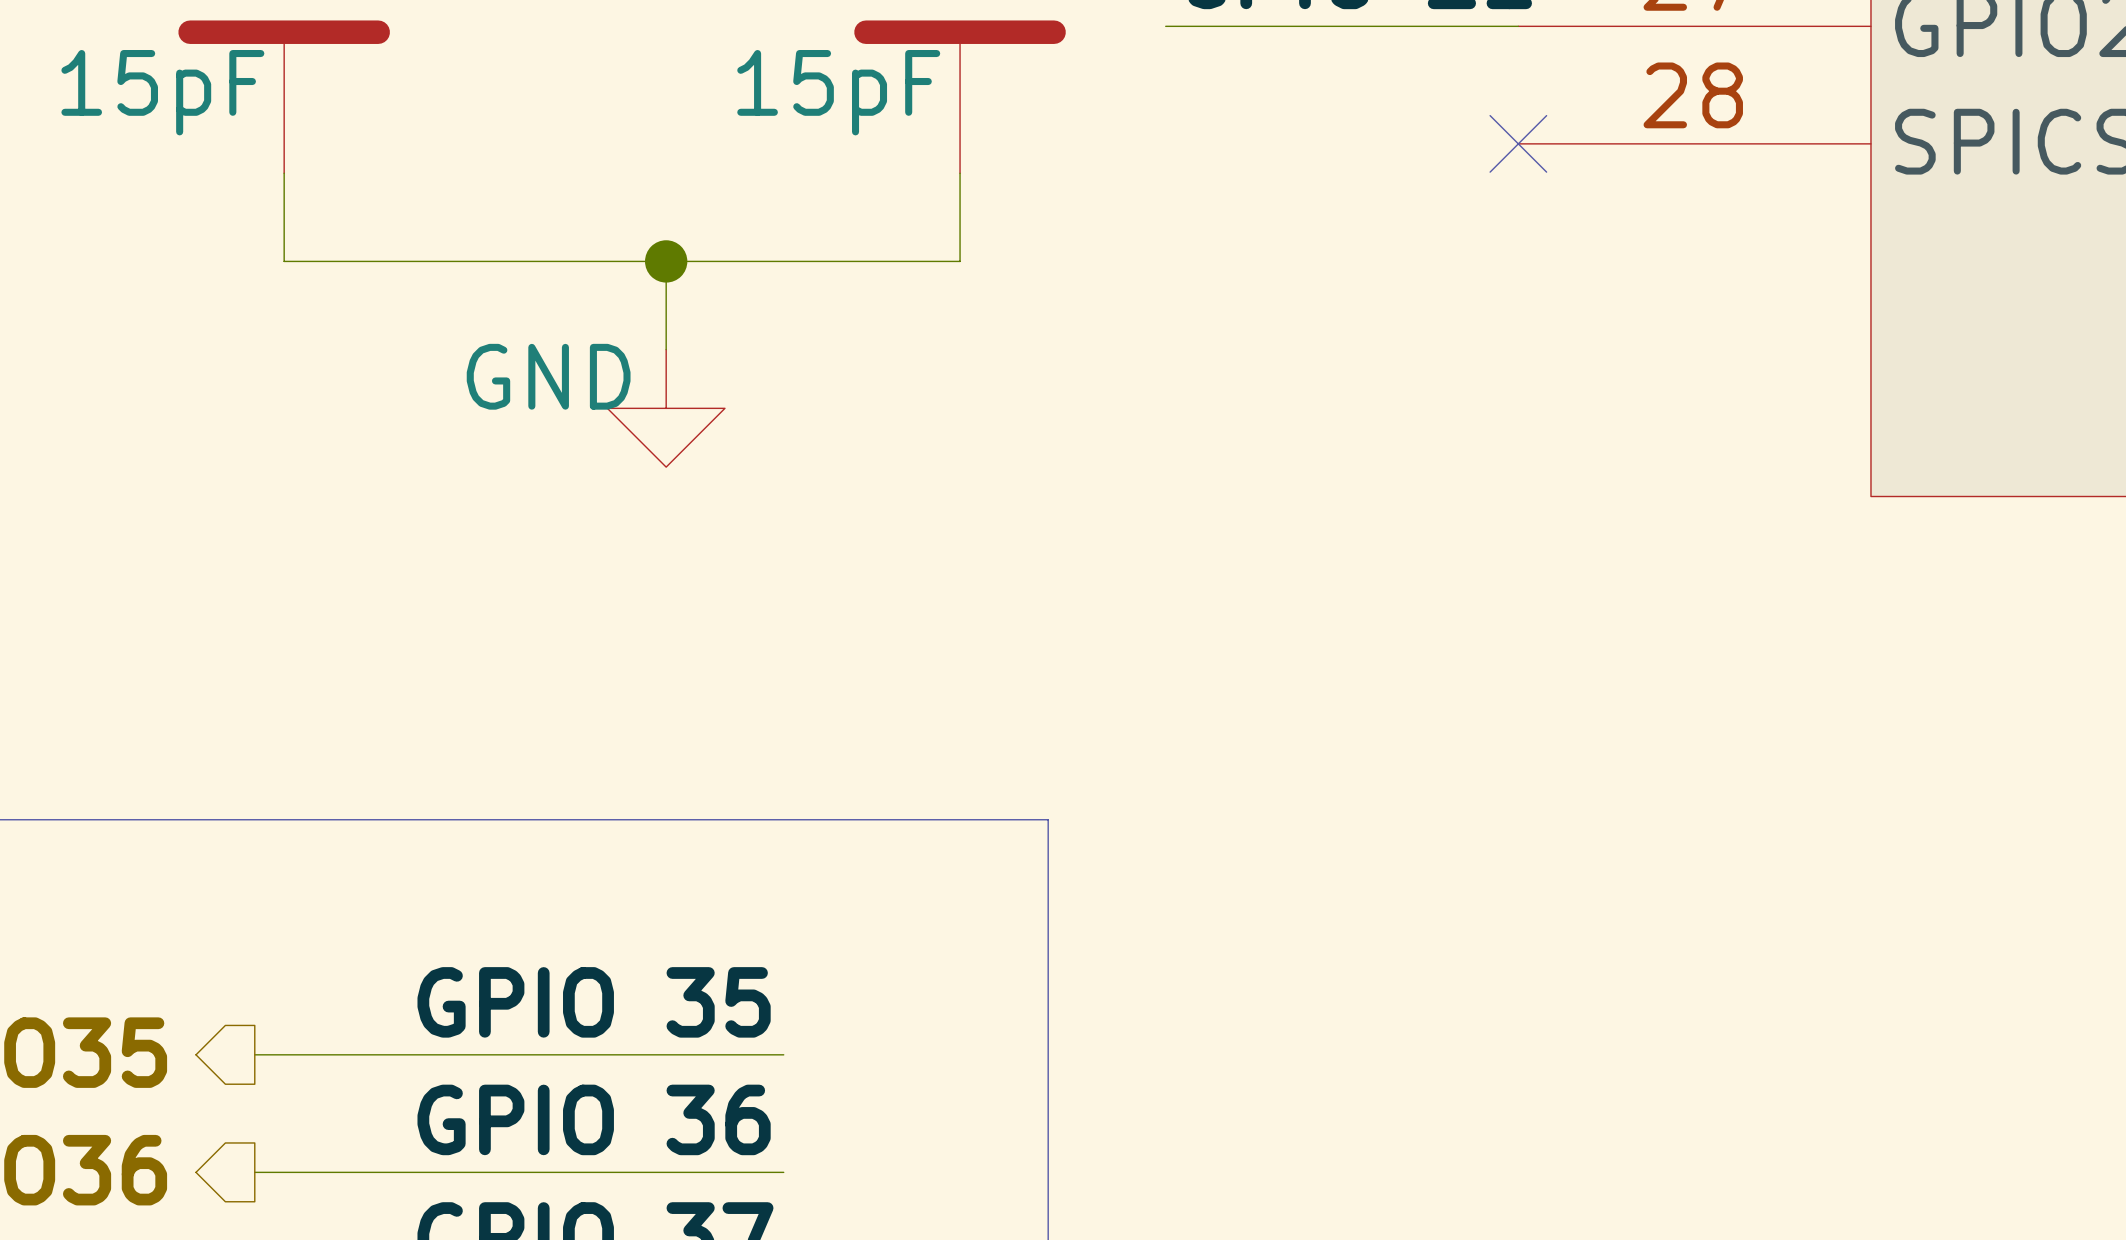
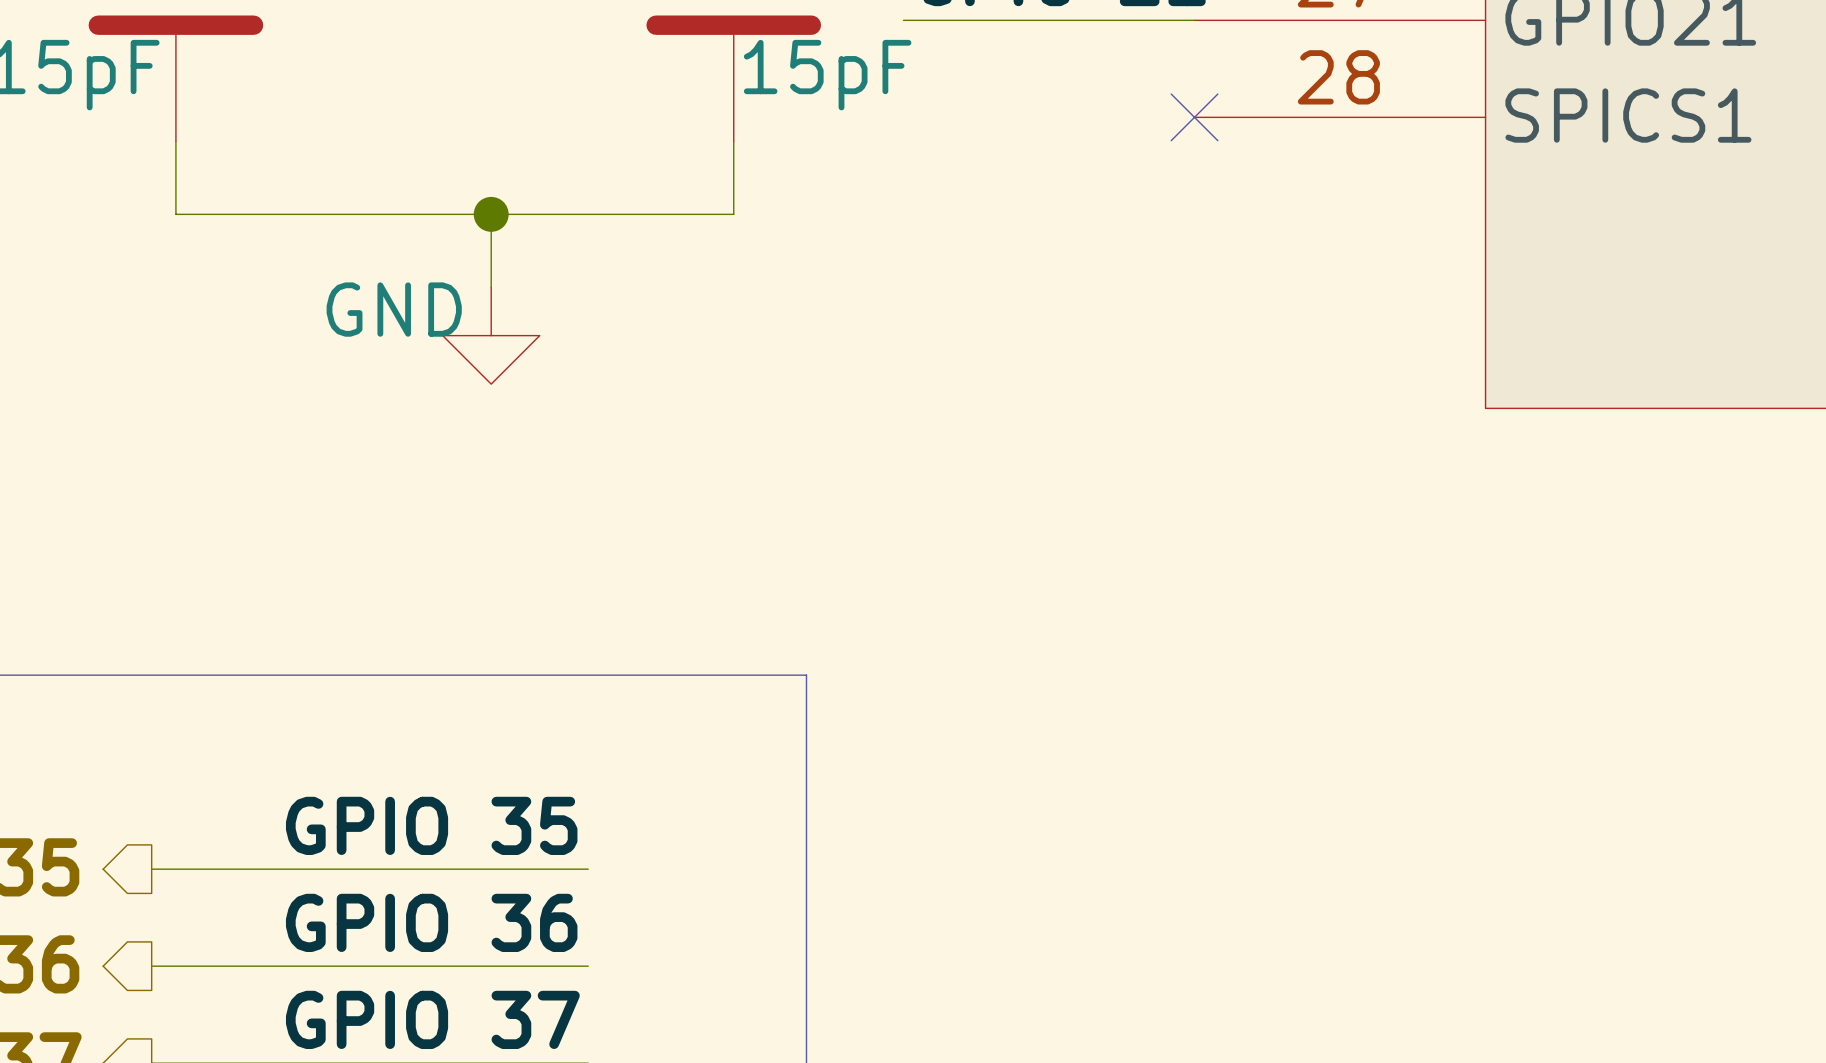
part value position: 15pF (838, 92) -> 15pF (827, 75)

